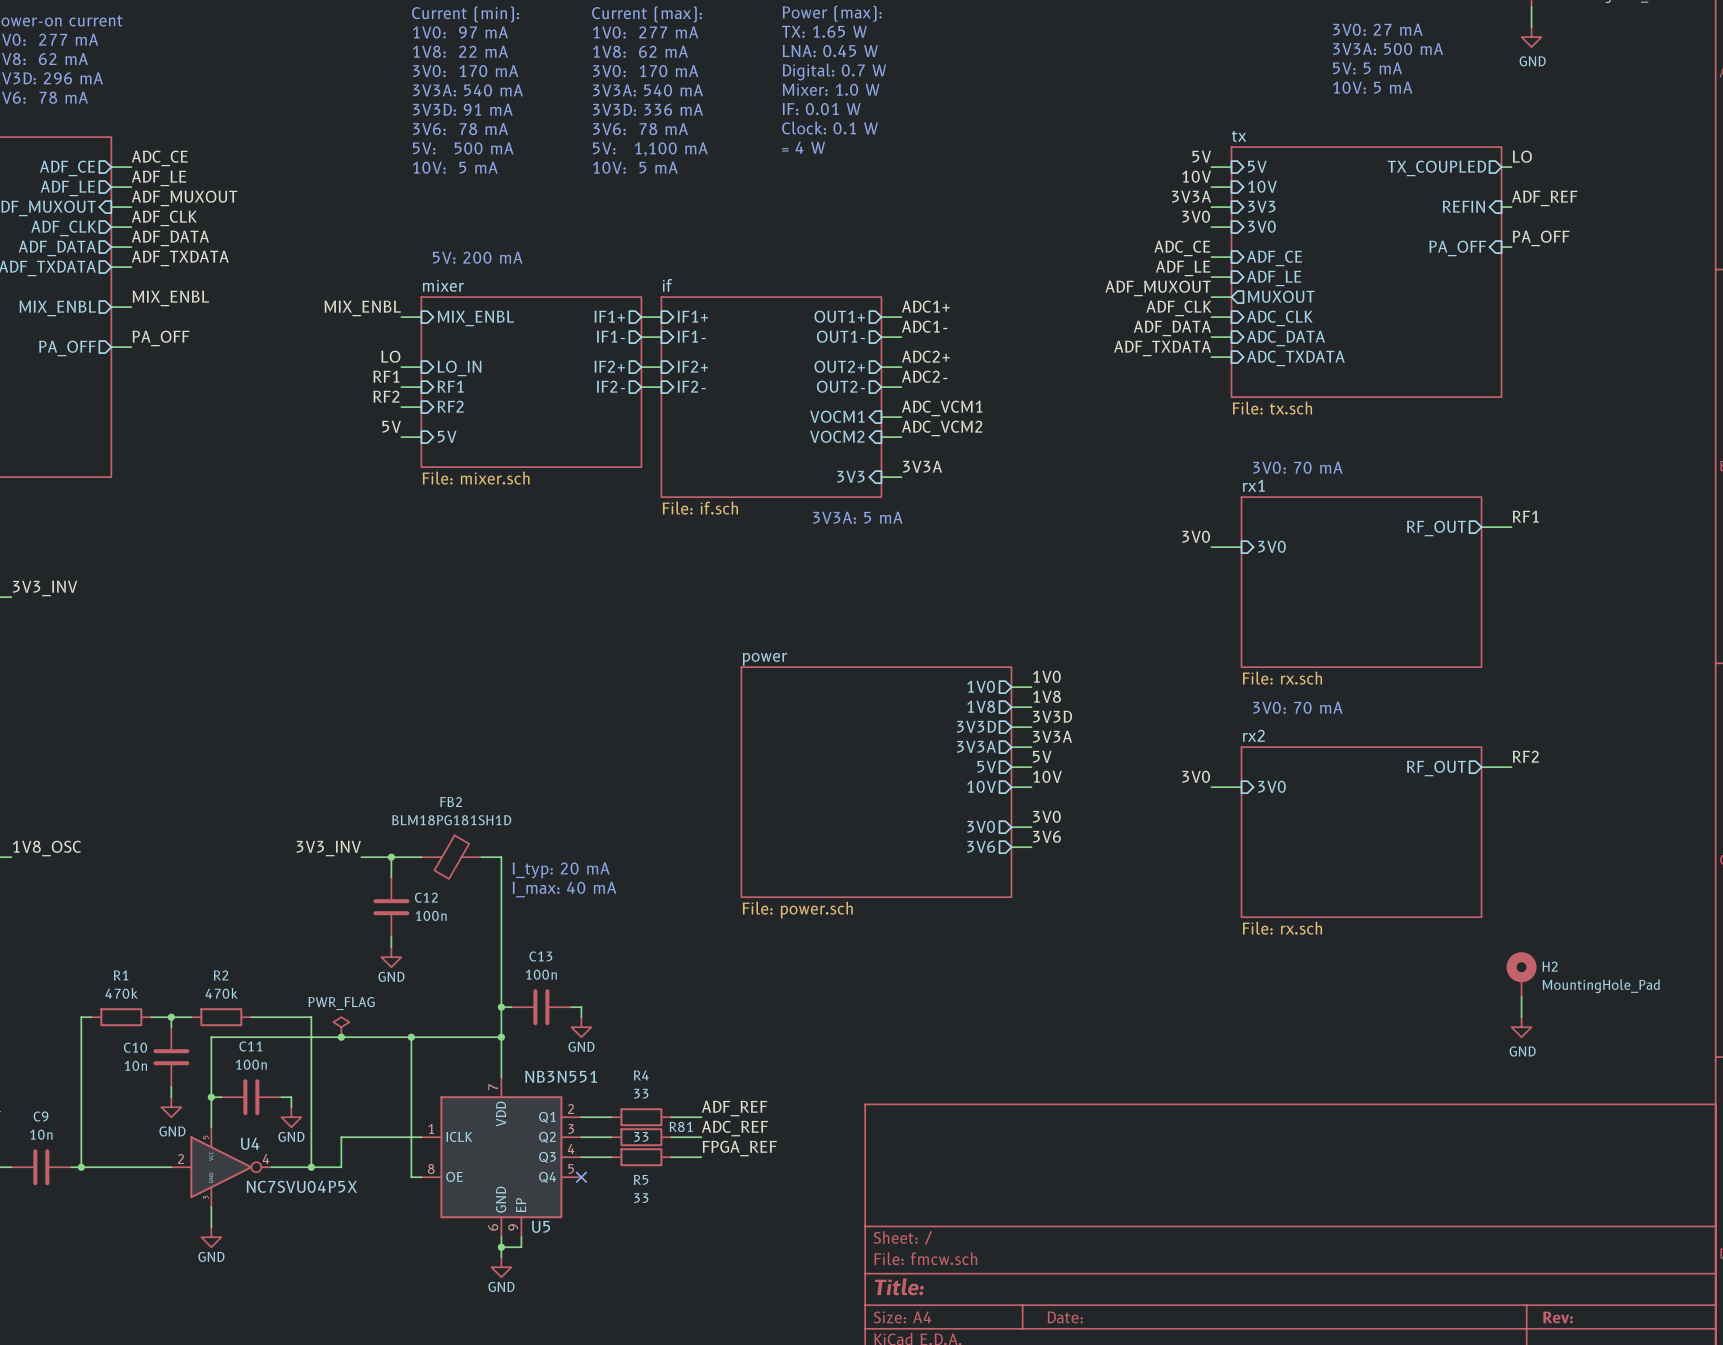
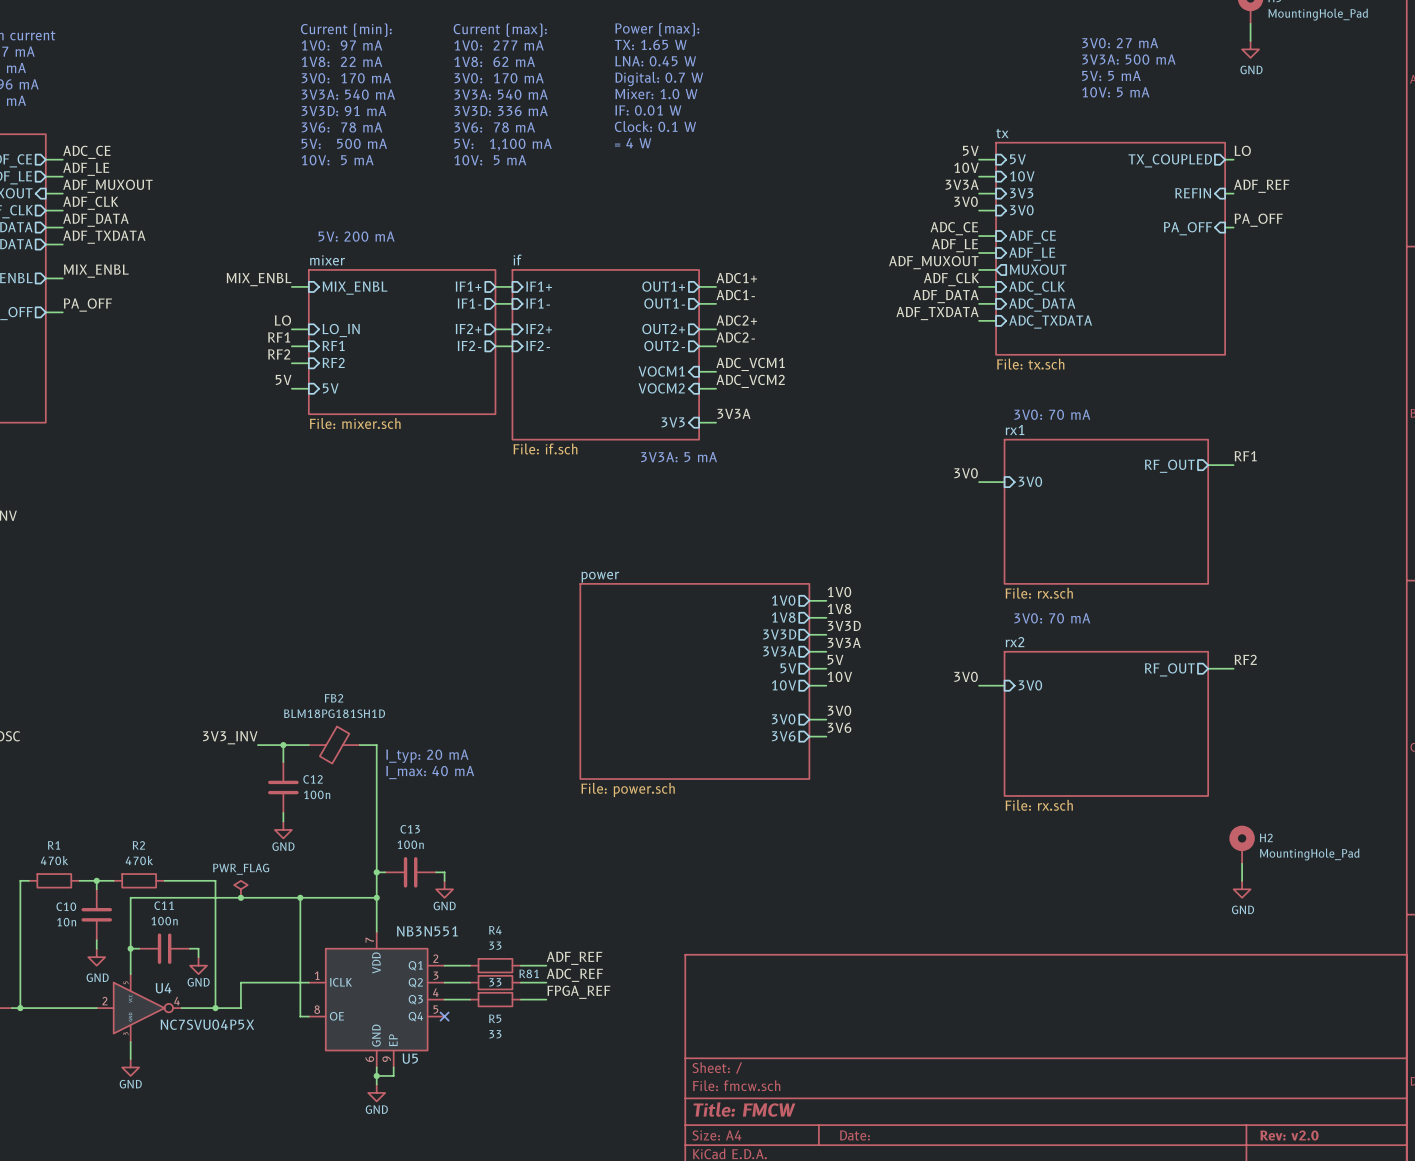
title block: Title: (899, 1286) -> Title: FMCW (744, 1109)
title block: Rev: (1557, 1317) -> Rev: v2.0 (1289, 1135)

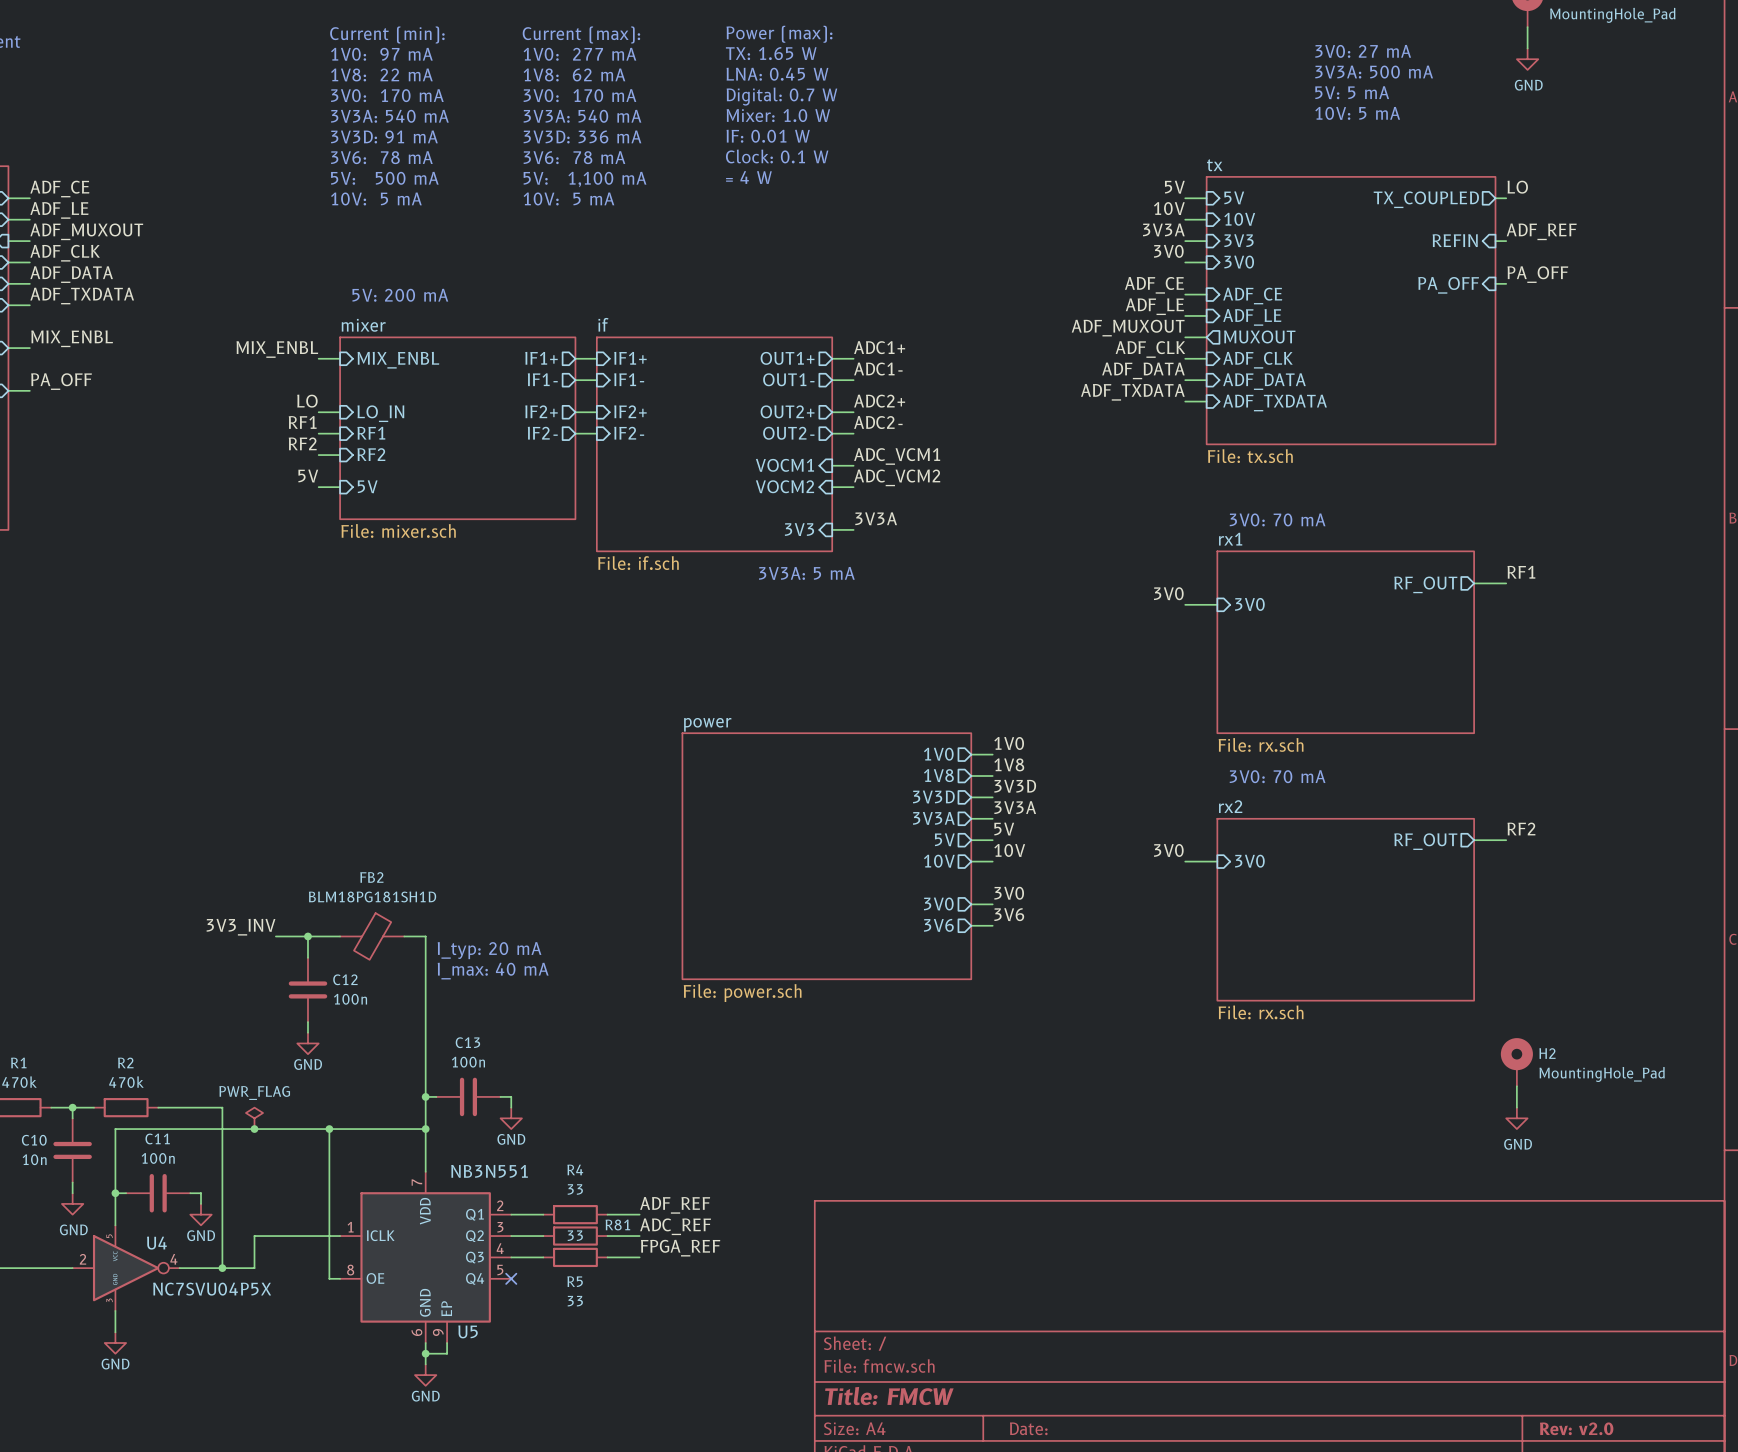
label: ADC_CE (86, 152) -> ADF_CE (59, 189)
label: ADC_CE (954, 228) -> ADF_CE (1154, 285)
sheet pin: ADC_CLK (1037, 288) -> ADF_CLK (1257, 360)
sheet pin: ADC_DATA (1042, 305) -> ADF_DATA (1264, 381)
sheet pin: ADC_TXDATA (1050, 322) -> ADF_TXDATA (1275, 403)

